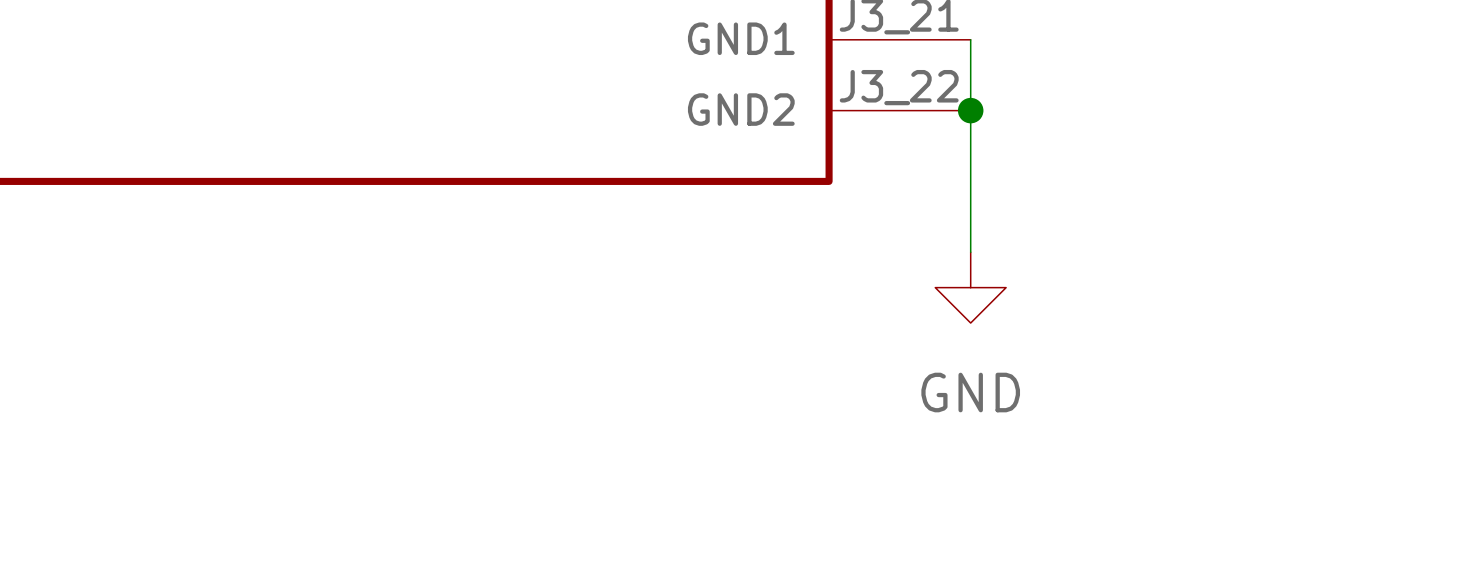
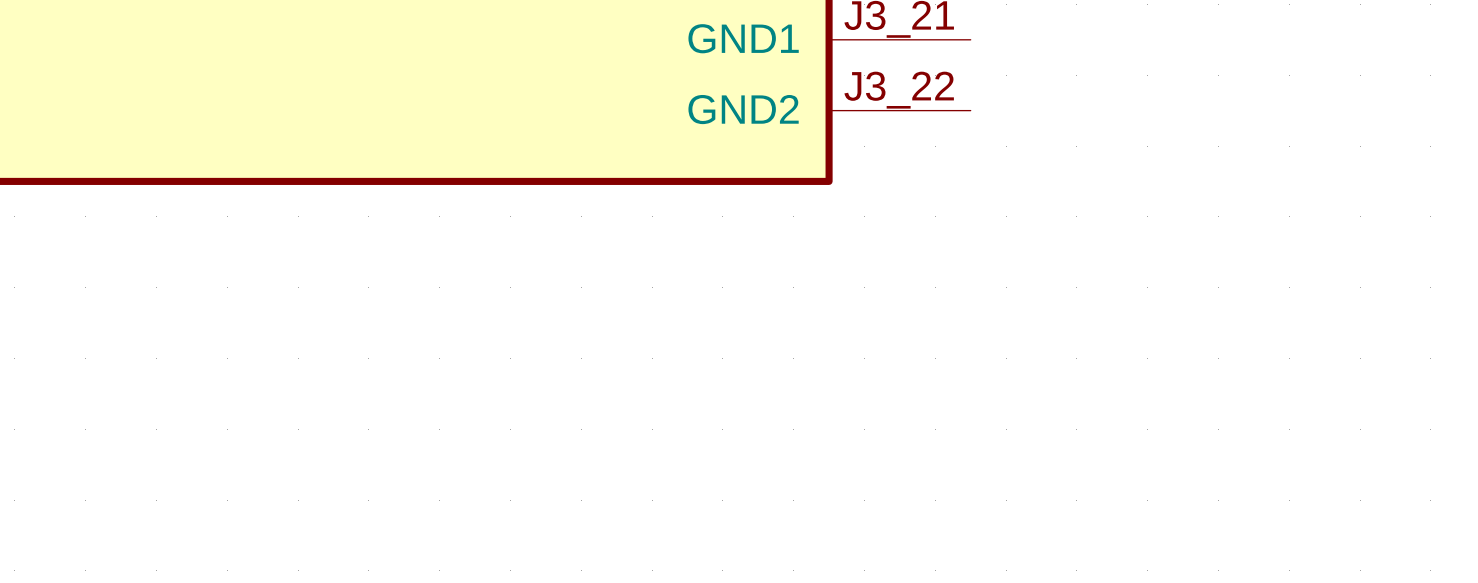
wire: (970, 39) (970, 252) -> none
junction: (970, 110) -> none
power symbol: GND (970, 287) -> none

